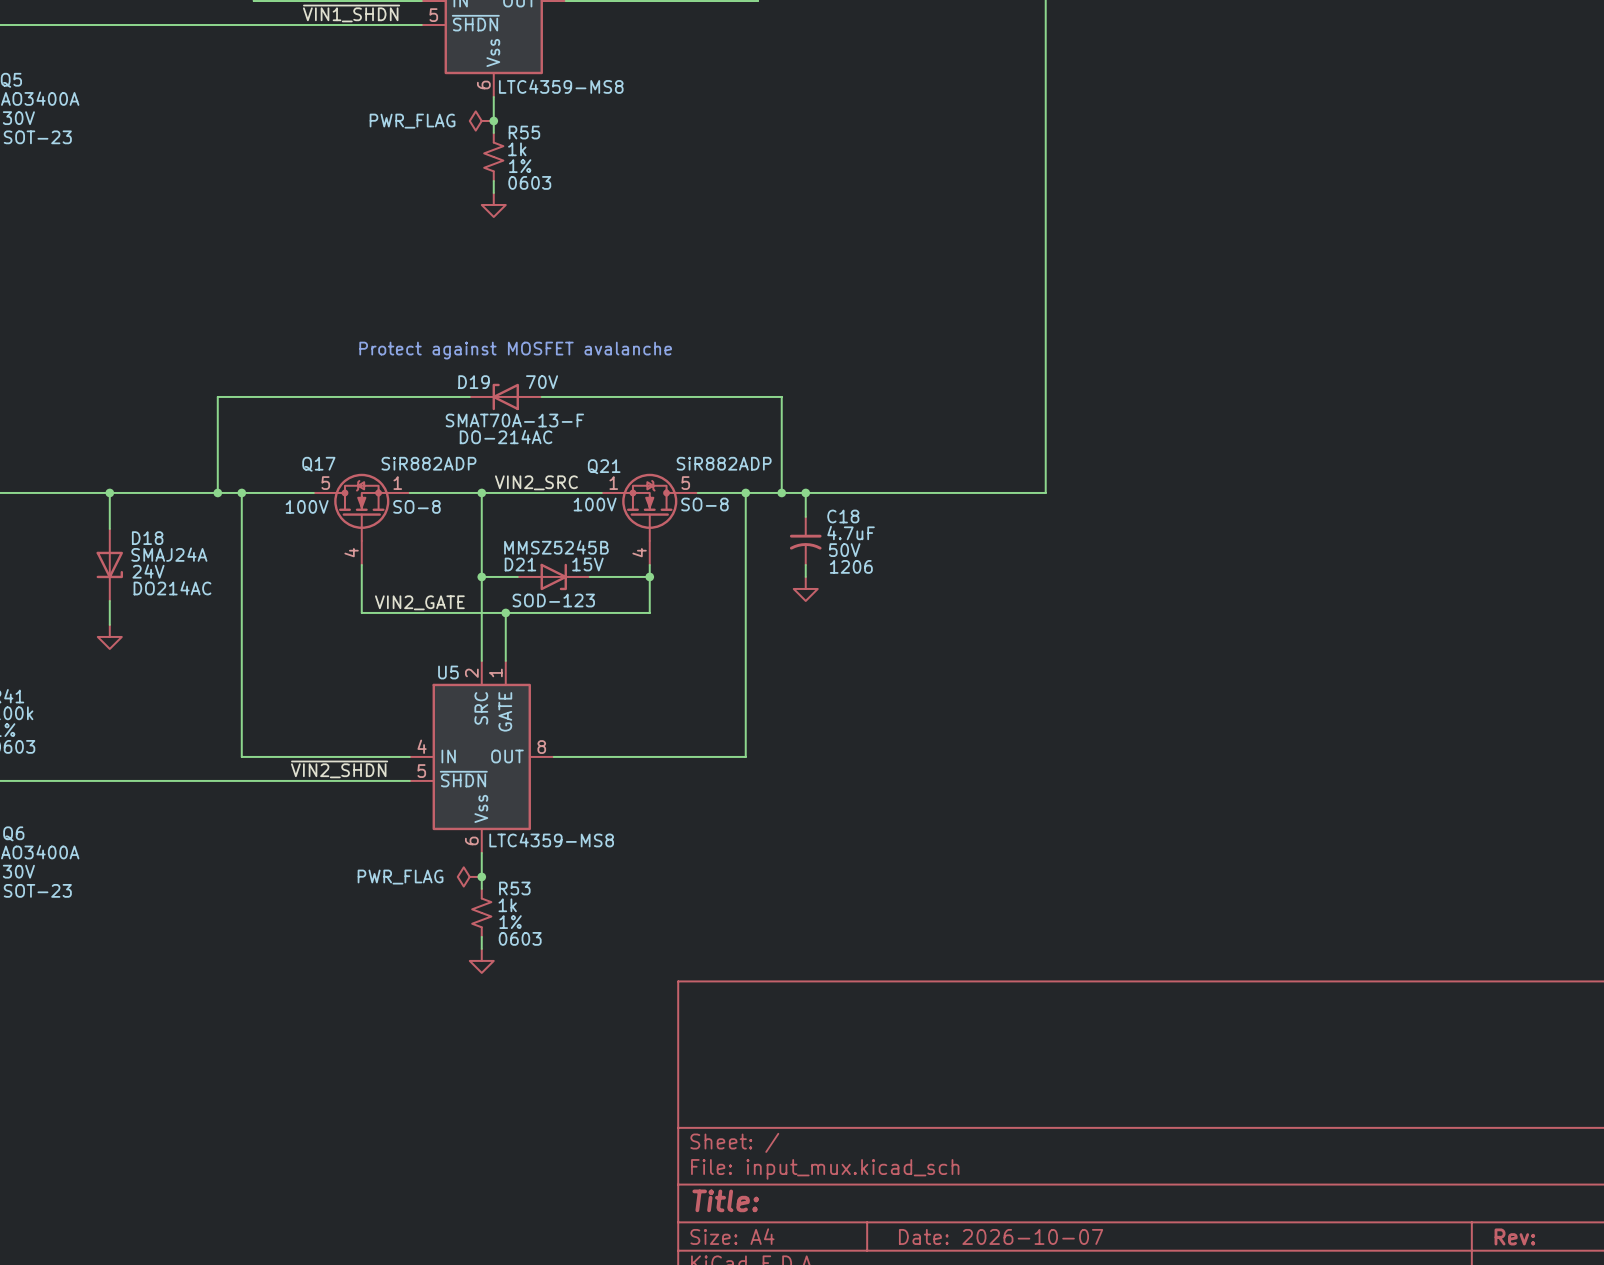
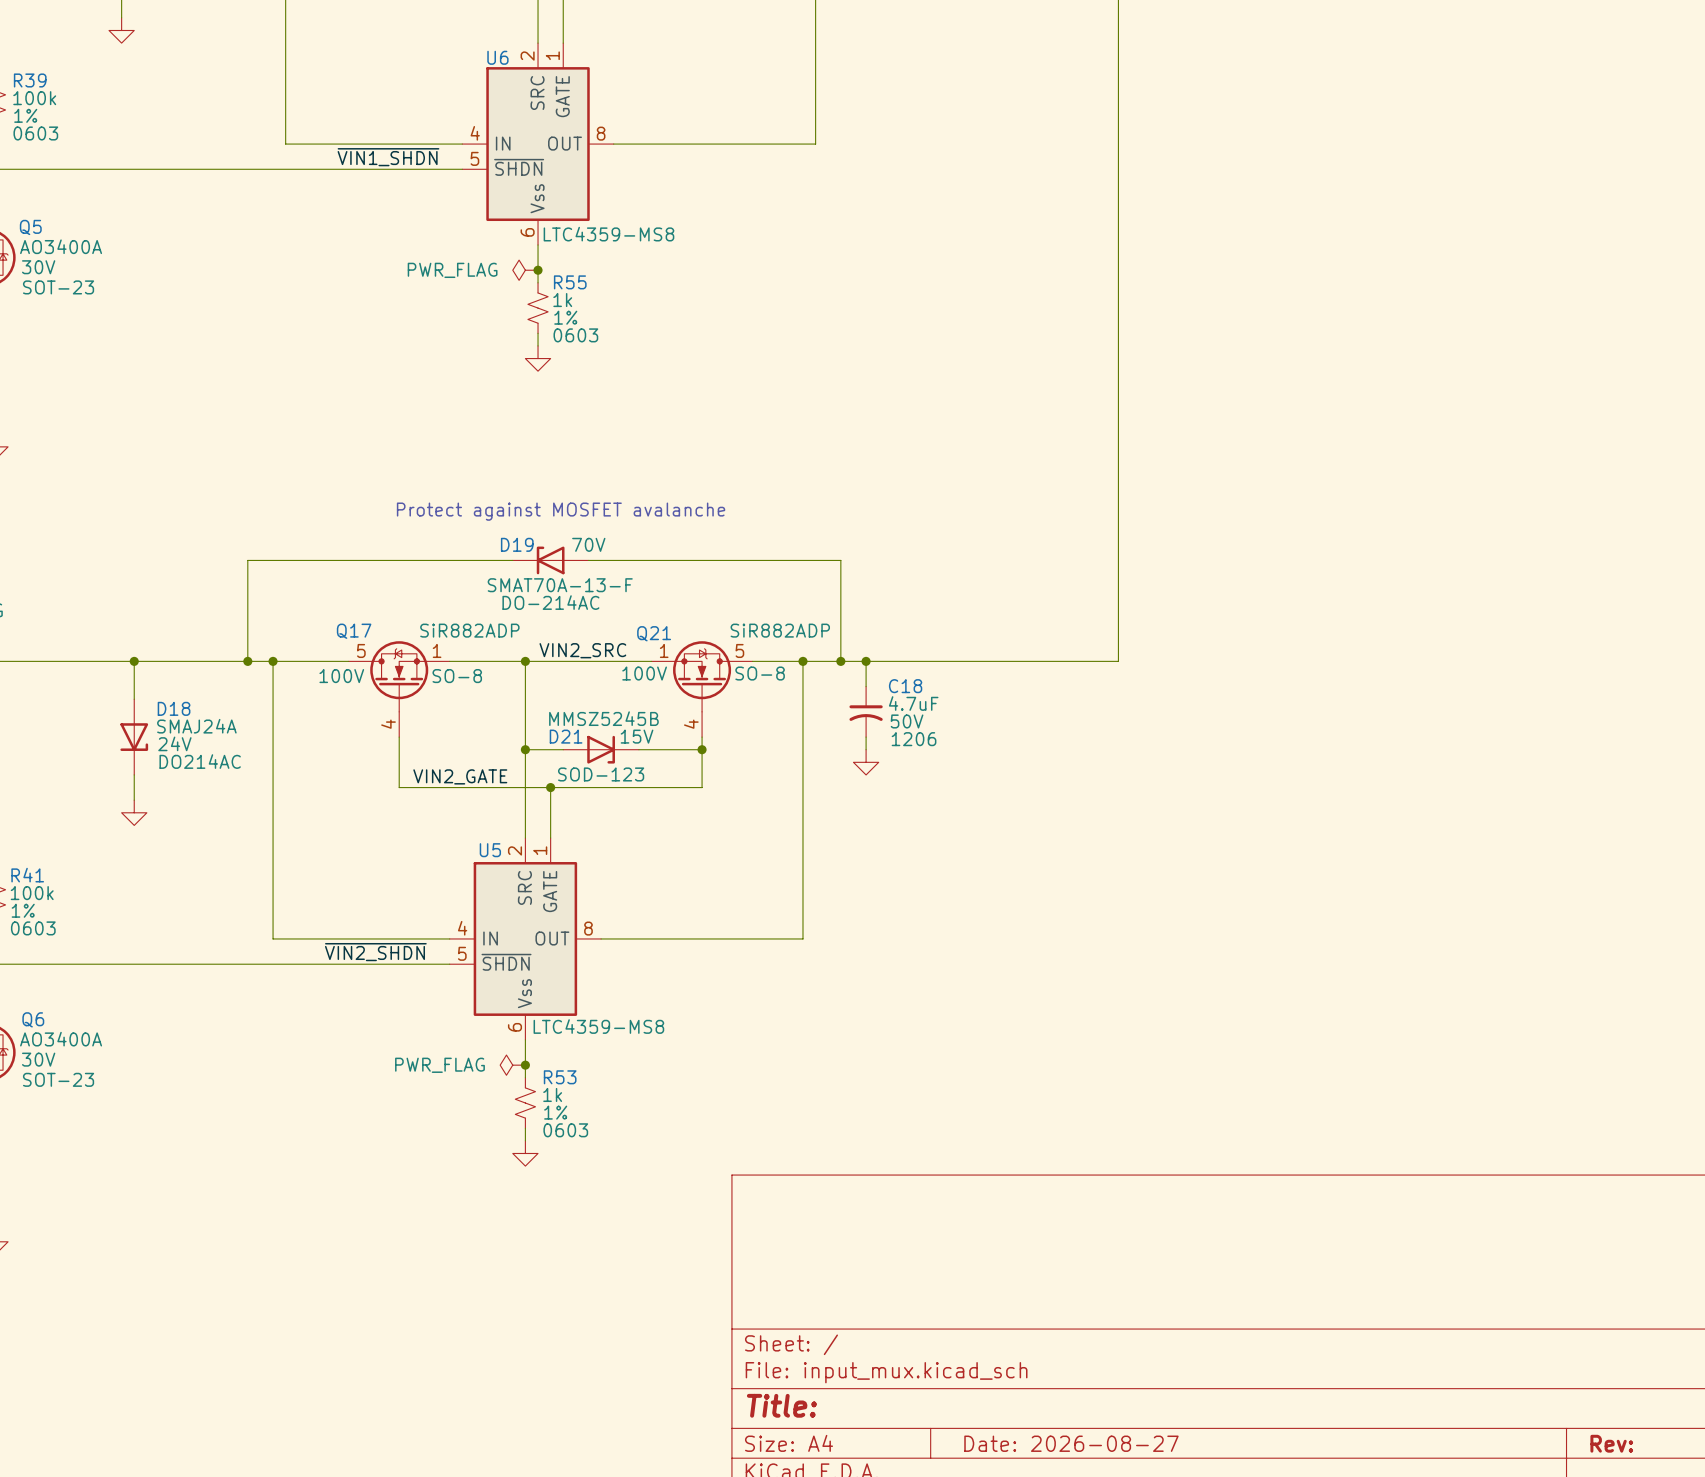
title block: Date: 2026-10-07 (1001, 1236) -> Date: 2026-08-27 (1071, 1443)

